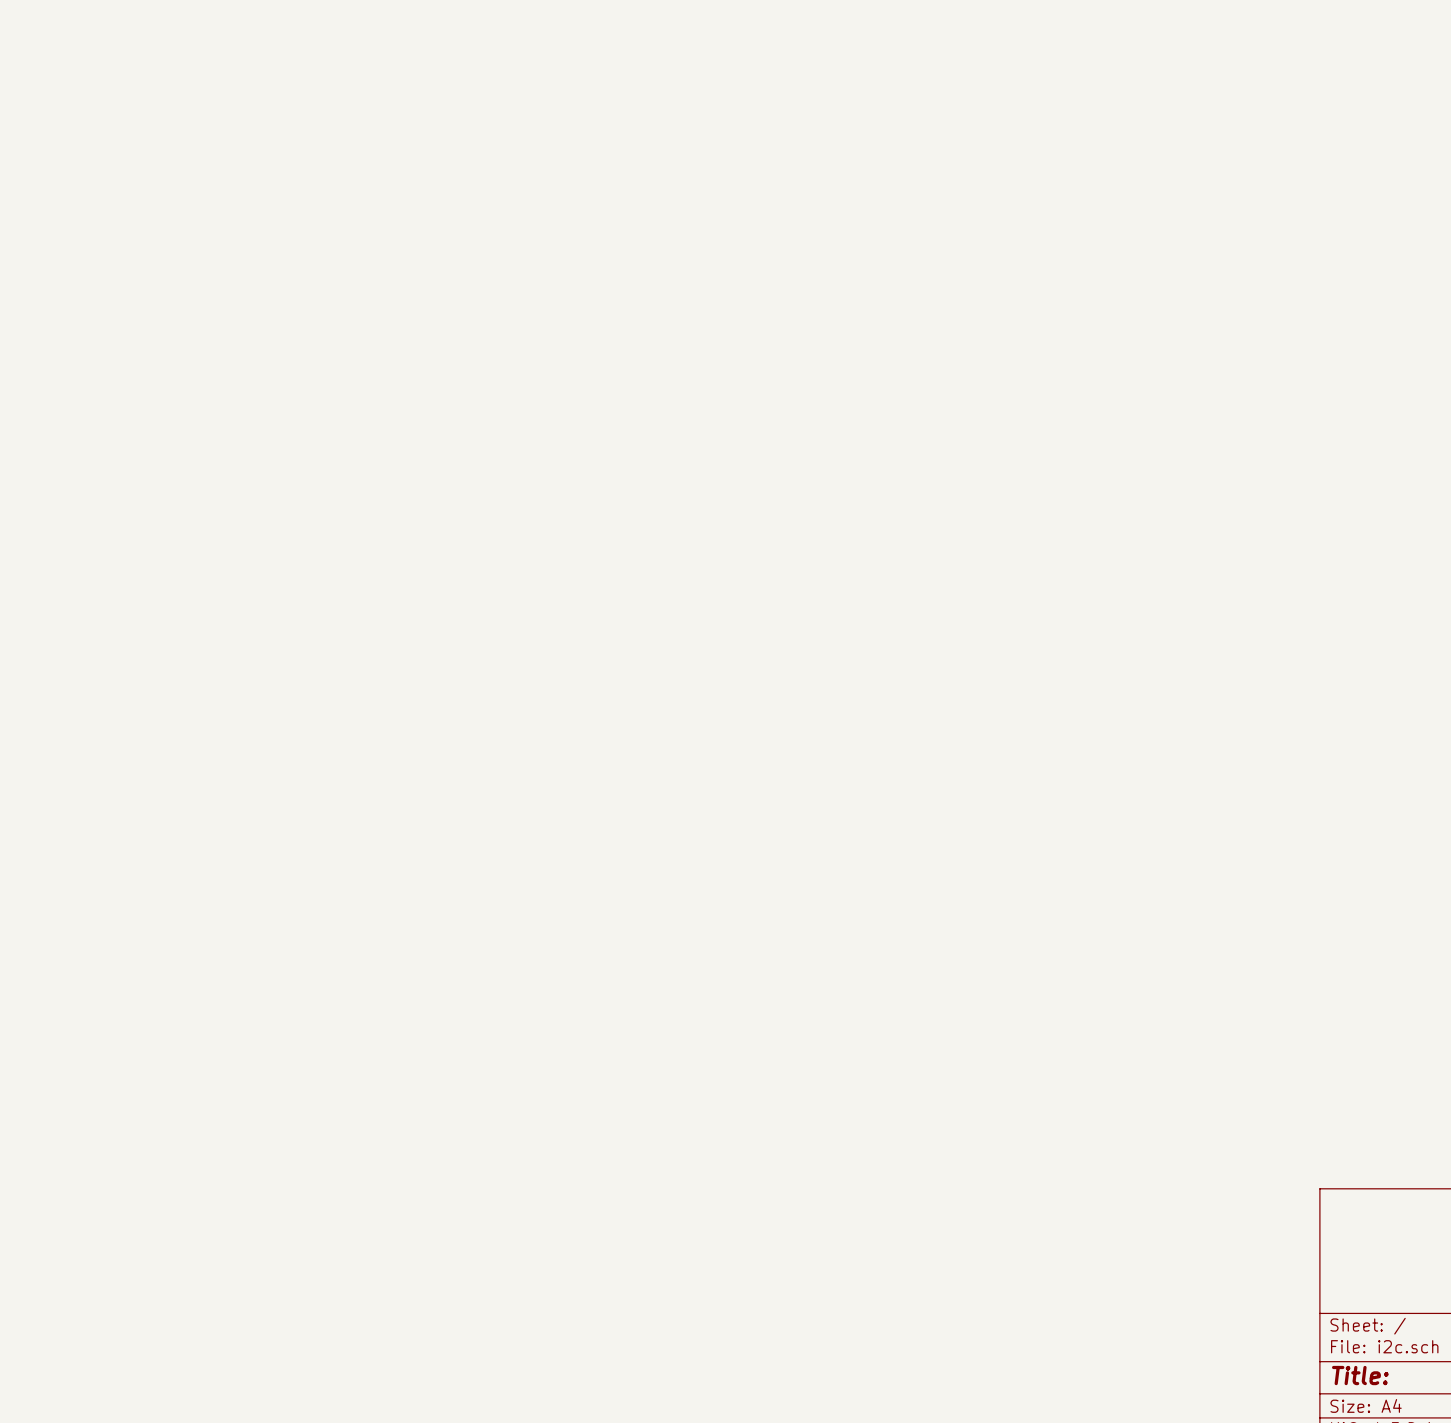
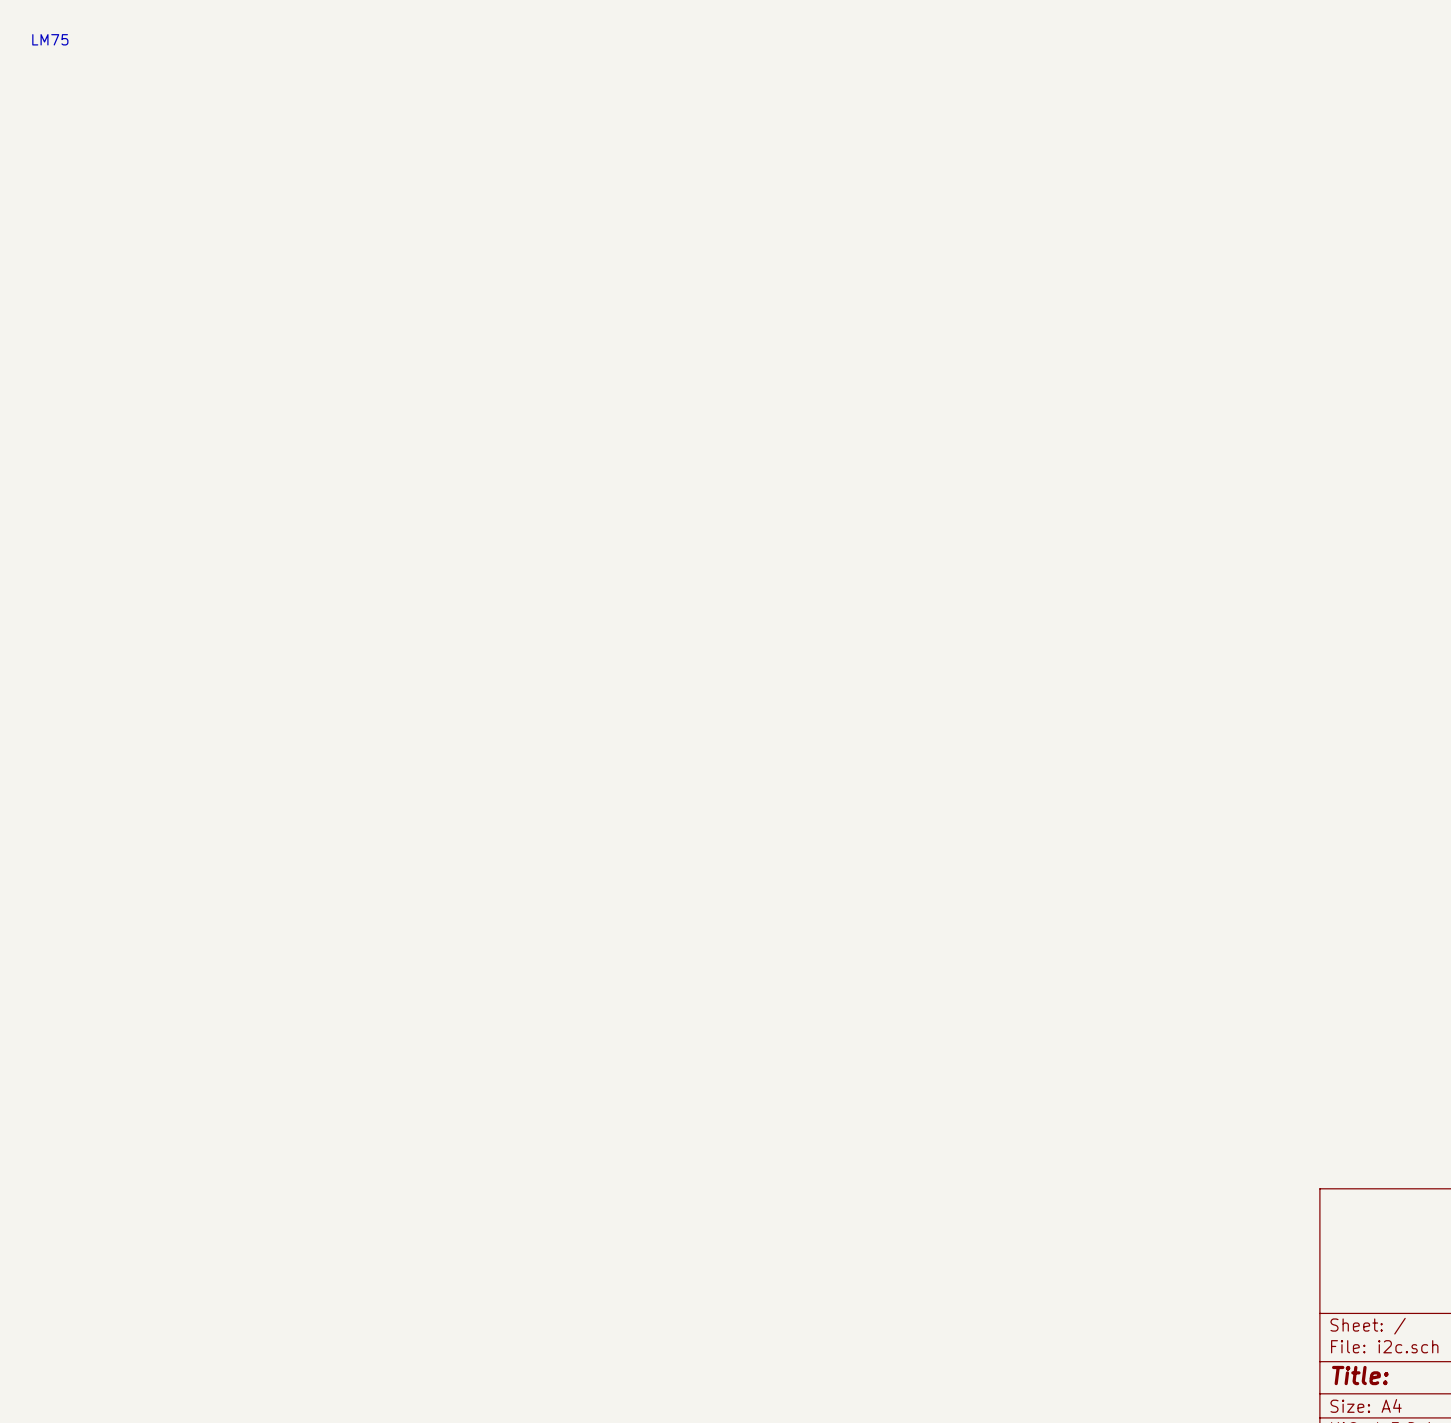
text: none -> LM75 (50, 39)

